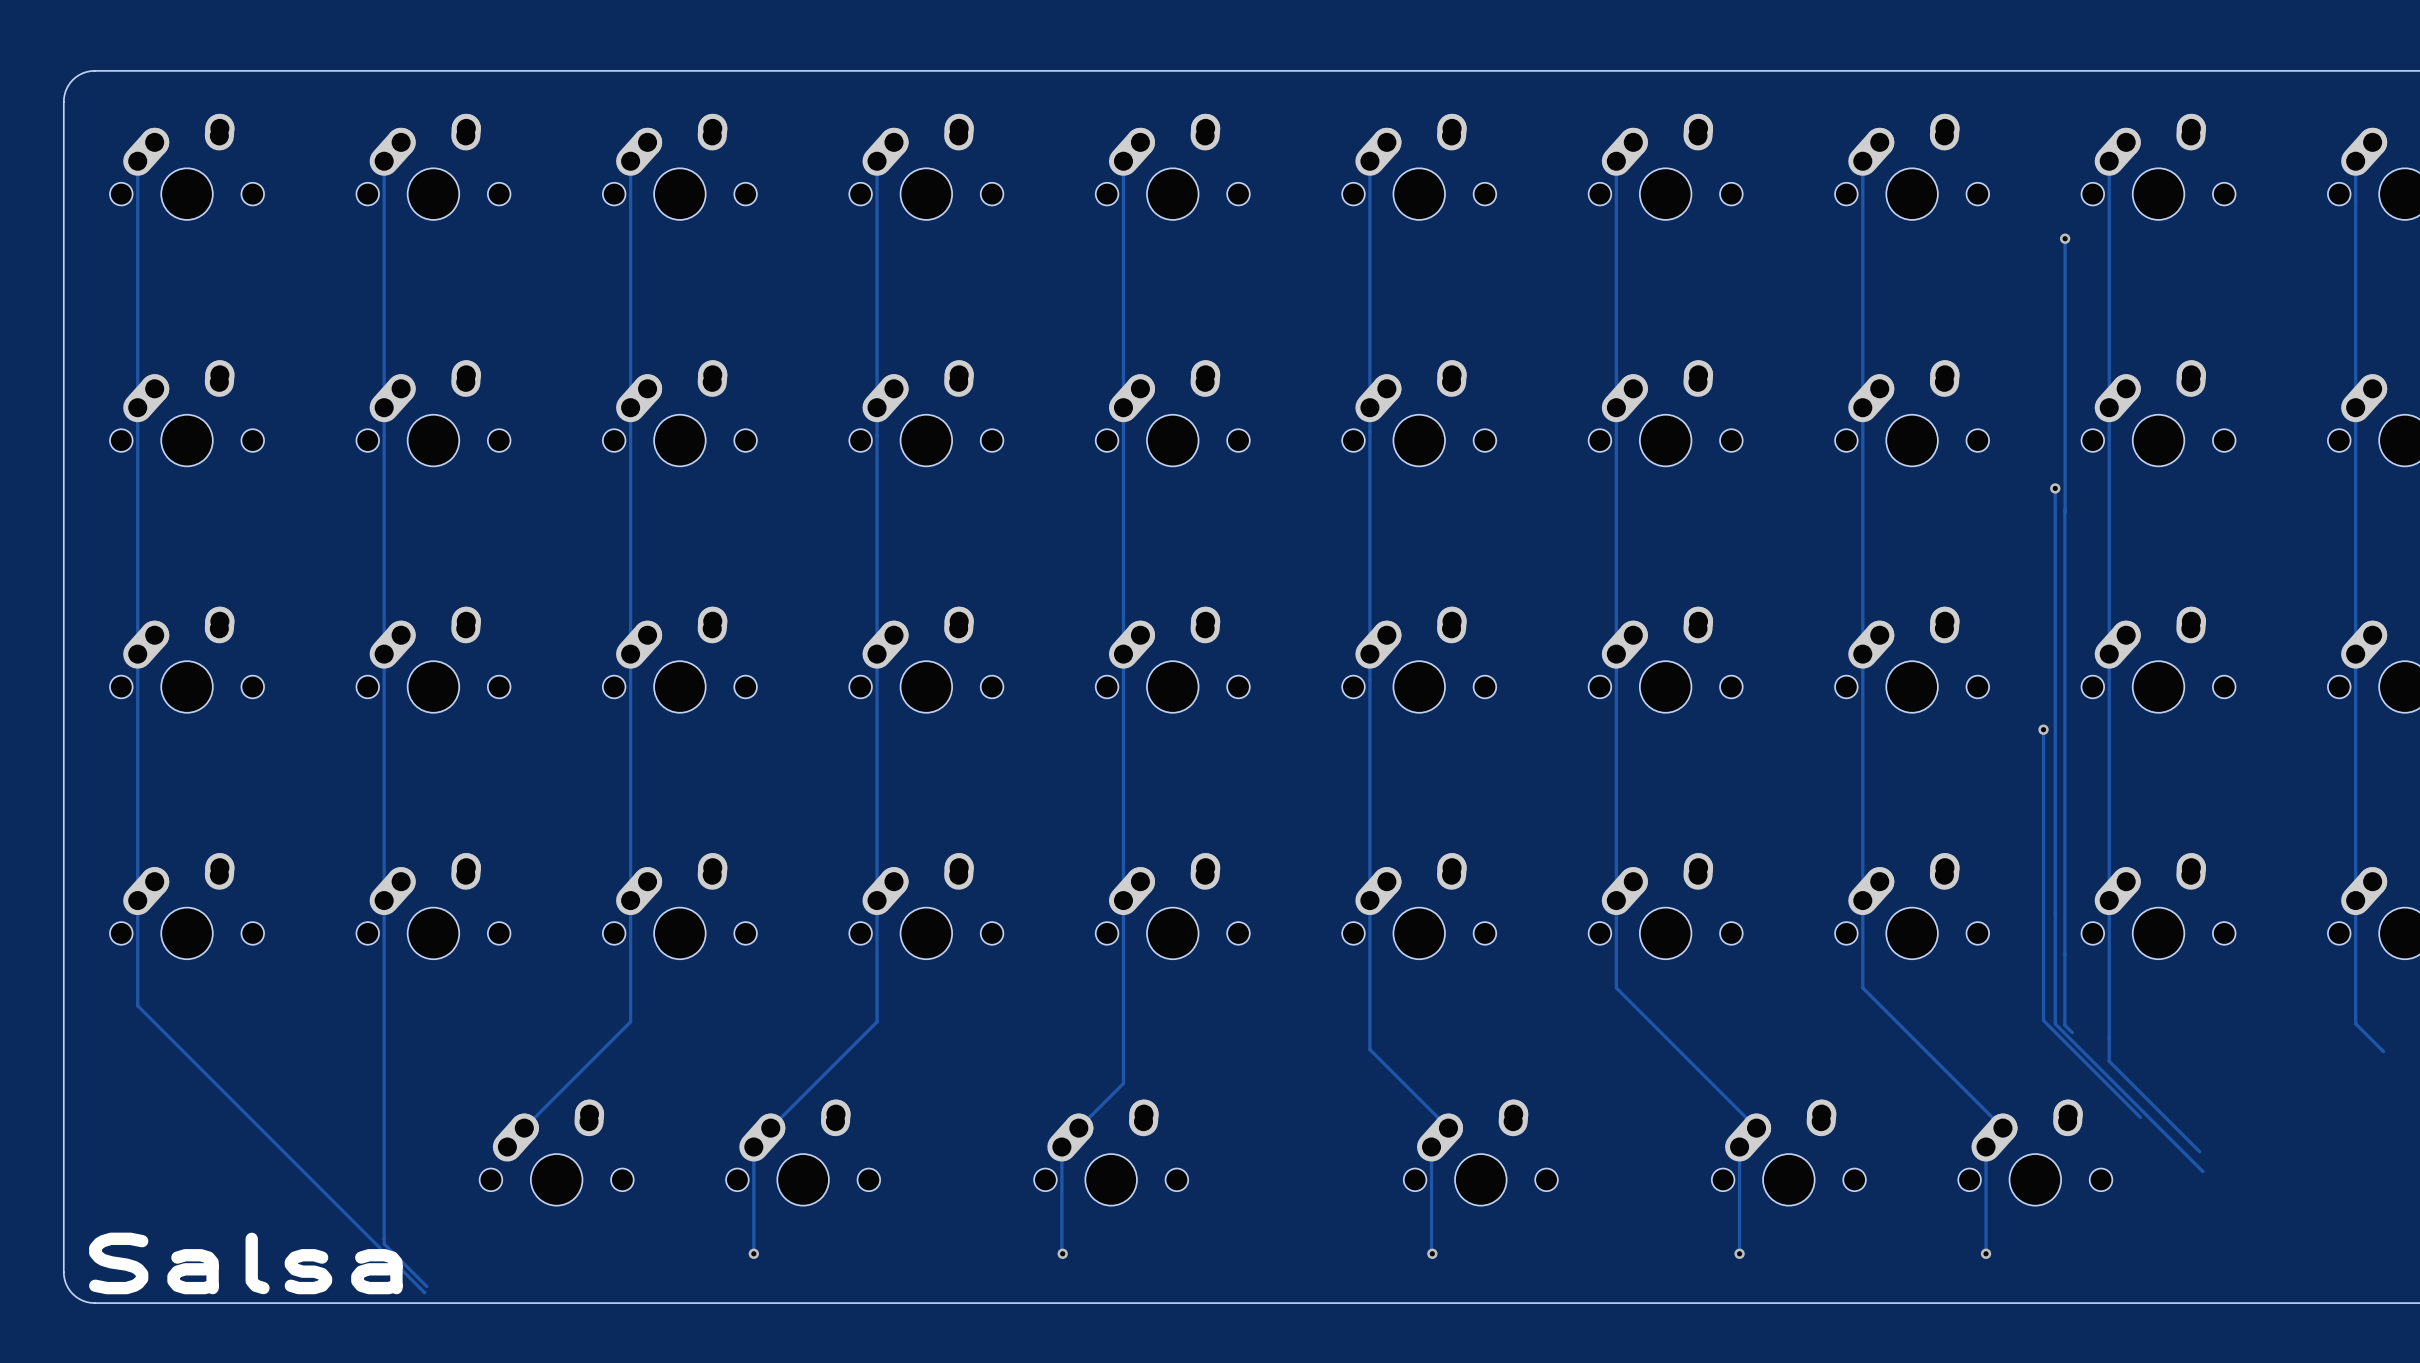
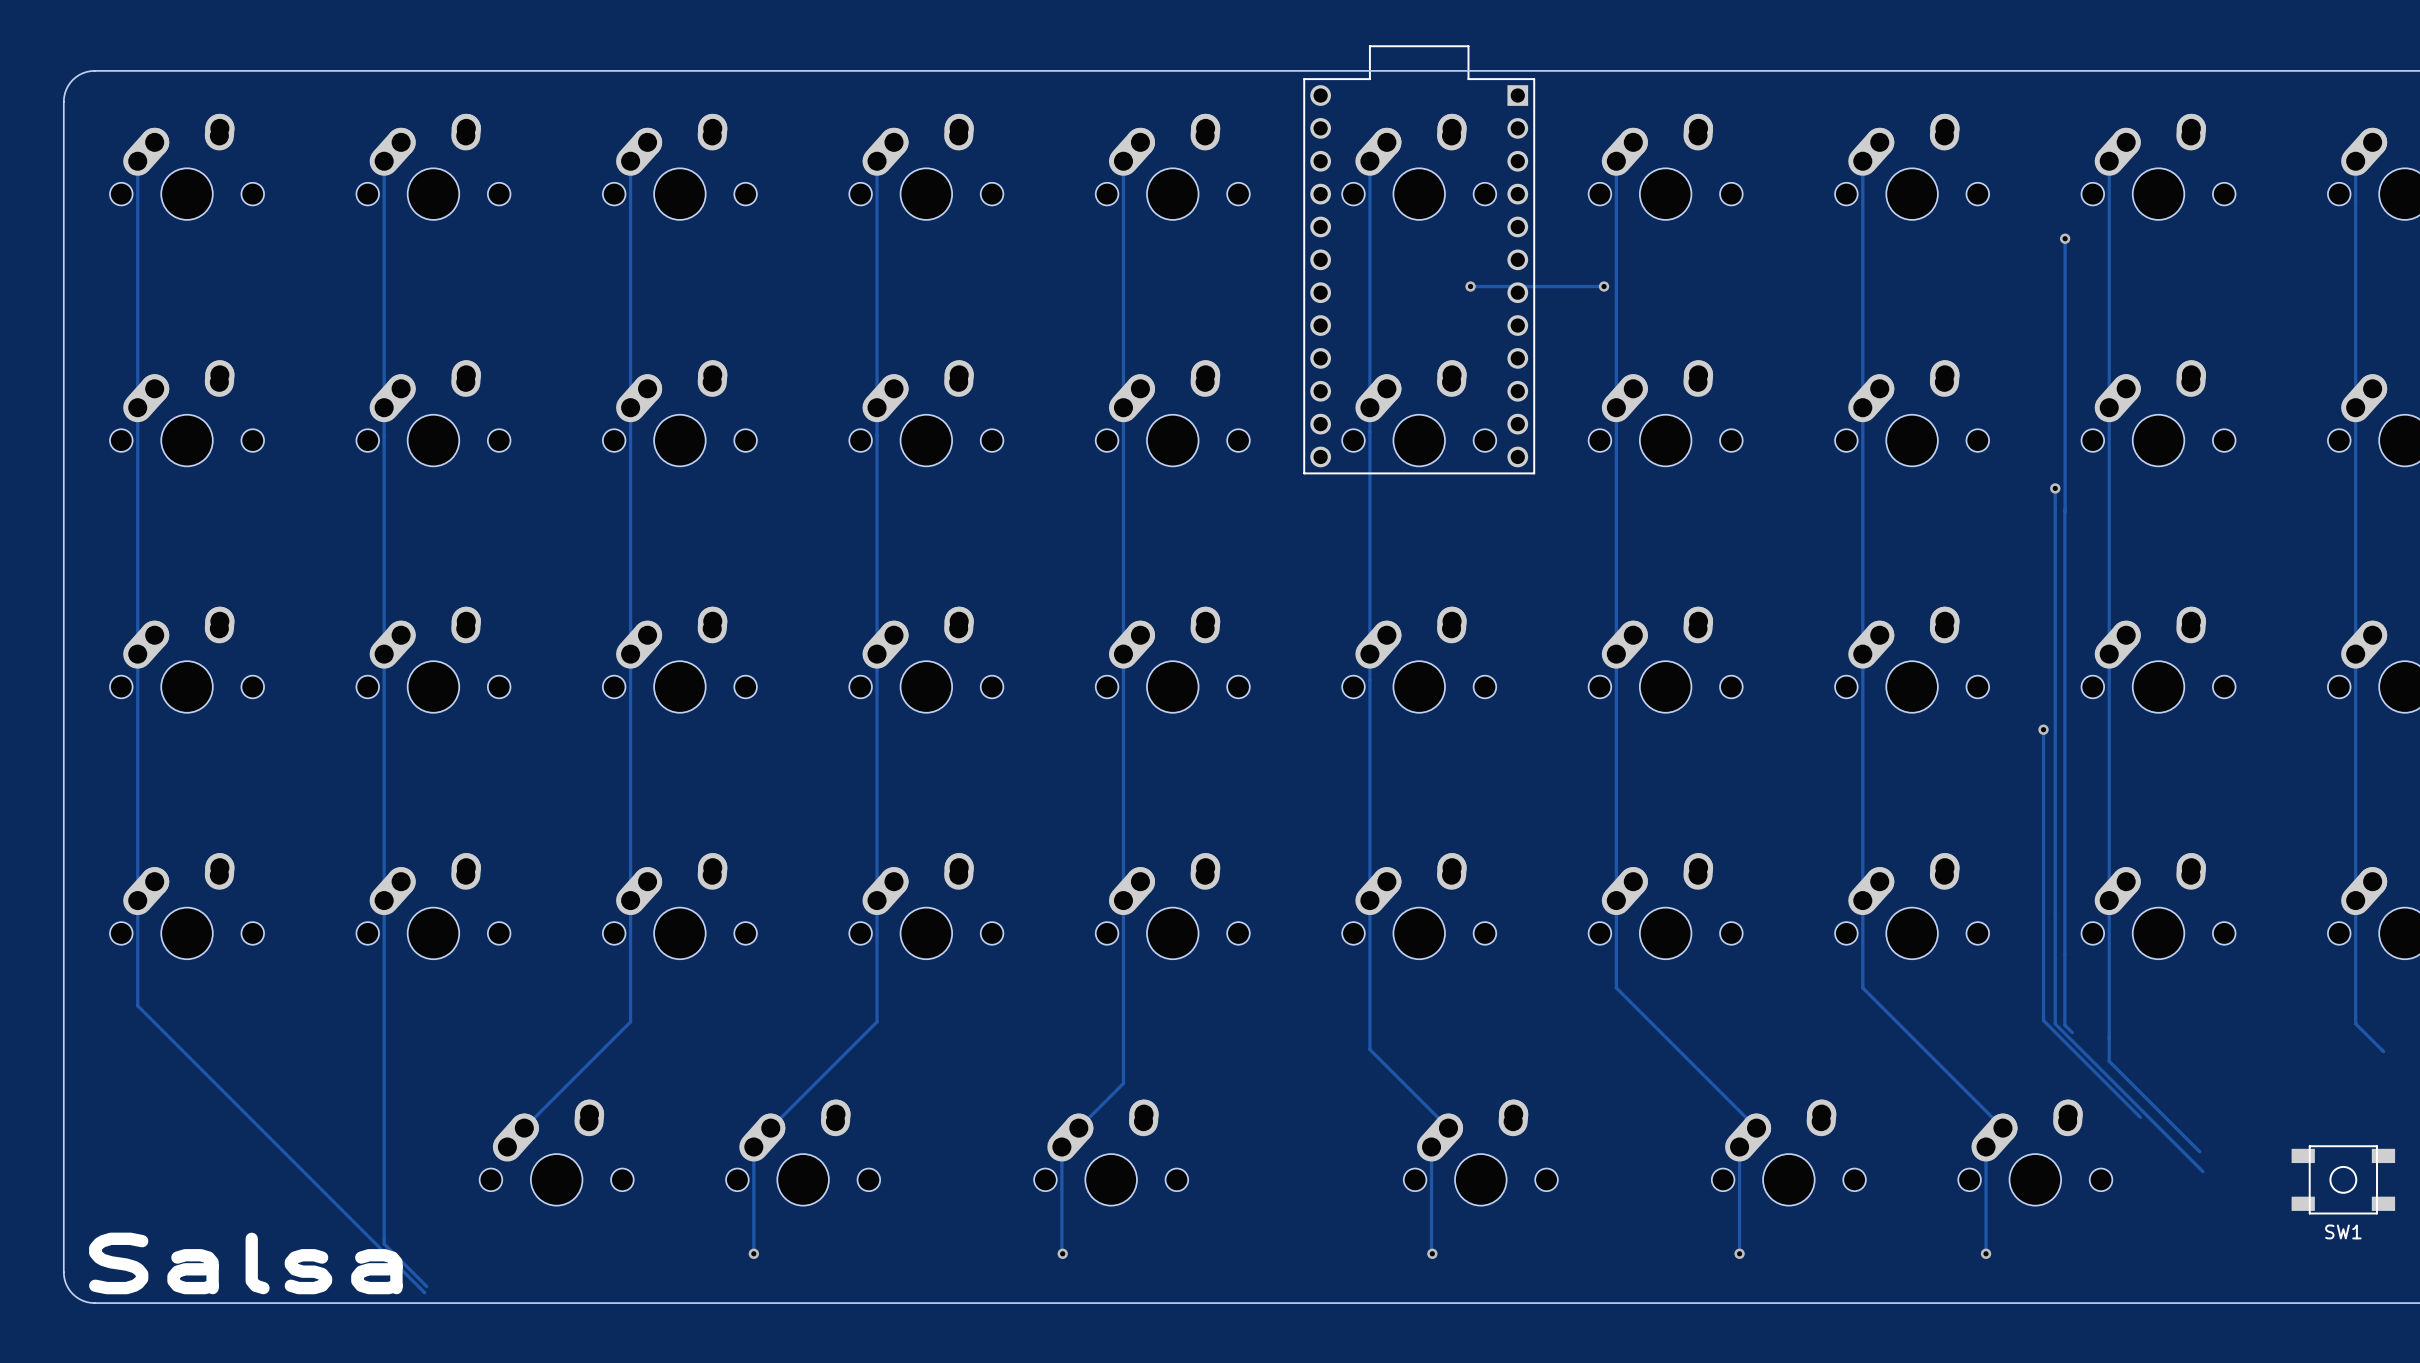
part: none -> (1419, 259)
track: none -> (1470, 286) (1604, 286)
via: none -> (1470, 286)
via: none -> (1604, 286)
SW1: none -> (2343, 1179)

